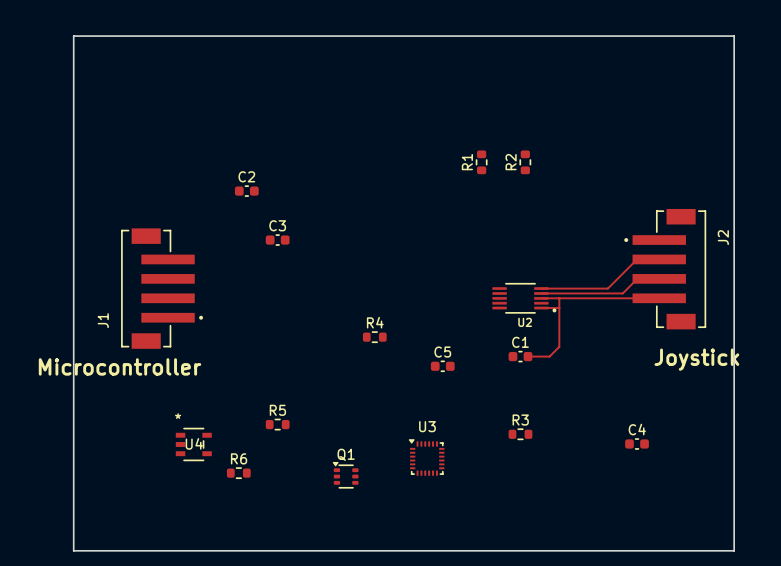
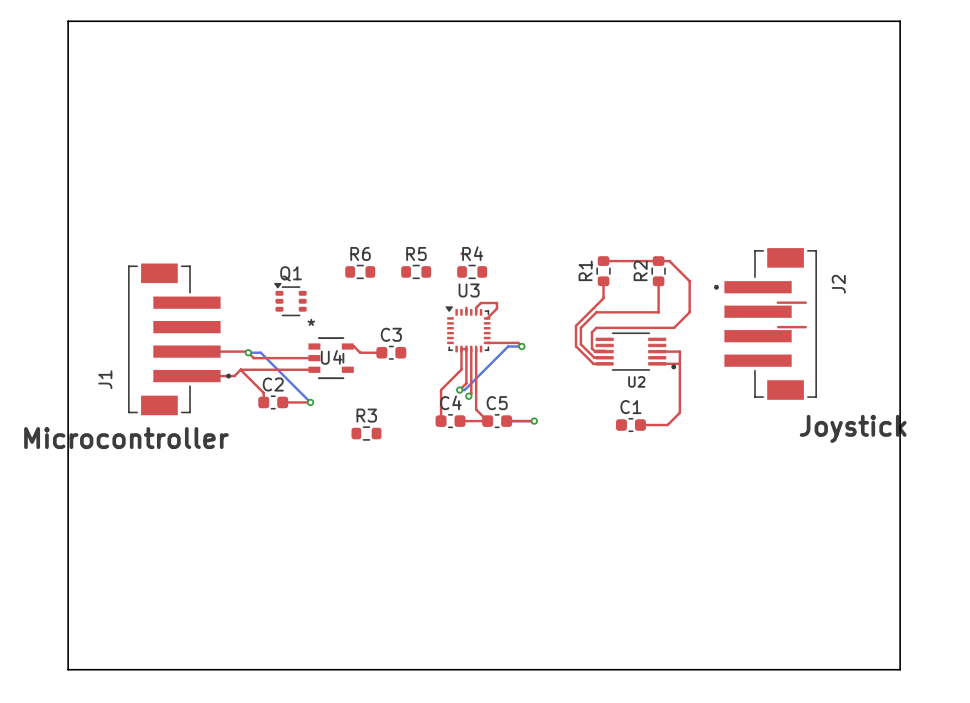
R1 position: (481, 162) -> (603, 271)
R2 position: (525, 162) -> (658, 271)
C2 position: (246, 191) -> (273, 402)
top track: none -> (462, 253) (461, 253)
top track: none -> (603, 261) (669, 261) (689, 281) (689, 312) (674, 327) (596, 327) (591, 332) (591, 348) (595, 351) (604, 351) (596, 350)
C3 position: (277, 240) -> (391, 352)
top track: none -> (603, 281) (603, 298) (576, 325) (576, 346) (593, 363) (604, 363)
top track: none -> (658, 281) (658, 312) (596, 312) (580, 327) (580, 344) (594, 357) (604, 357)
top track: (637, 259) (607, 288) (541, 288) -> none
top track: none -> (466, 307) (466, 312)
top track: none -> (476, 312) (476, 307) (480, 303) (496, 303) (496, 308) (487, 318)
J2 position: (665, 269) -> (765, 323)
top track: (637, 278) (622, 293) (541, 293) -> none
top track: none -> (487, 342) (518, 342) (521, 346)
top track: none -> (347, 346) (354, 346) (360, 352) (381, 352)
bottom track: none -> (521, 346) (508, 346) (464, 390) (459, 390)
via: none -> (521, 346)
top track: none -> (471, 349) (471, 393) (468, 396)
top track: none -> (476, 349) (476, 409) (487, 421) (460, 421)
top track: none -> (186, 351) (247, 351) (253, 358) (314, 358)
top track: (559, 298) (659, 298) -> none
bottom track: none -> (248, 352) (260, 352) (310, 402)
via: none -> (248, 352)
top track: none -> (240, 369) (263, 392) (263, 402)
top track: none -> (314, 369) (240, 369) (234, 376) (186, 376)
top track: none -> (459, 390) (466, 383) (466, 349) (461, 349) (461, 369) (441, 390) (441, 421)
via: none -> (459, 390)
via: none -> (468, 396)
R4 position: (374, 337) -> (472, 271)
top track: none -> (282, 402) (310, 402)
via: none -> (310, 402)
top track: none -> (506, 421) (534, 421)
via: none -> (534, 421)
C5 position: (442, 366) -> (497, 421)
R5 position: (277, 424) -> (416, 271)
R3 position: (520, 434) -> (366, 433)
C4 position: (637, 443) -> (450, 421)
U4 position: (193, 444) -> (331, 358)
U3 position: (426, 457) -> (468, 329)
R6 position: (238, 473) -> (360, 271)
Q1 position: (345, 475) -> (290, 299)

